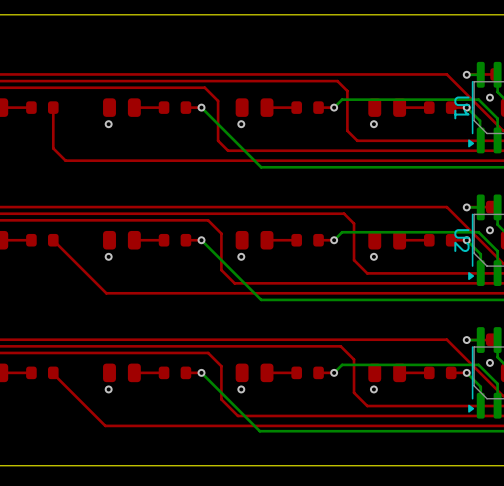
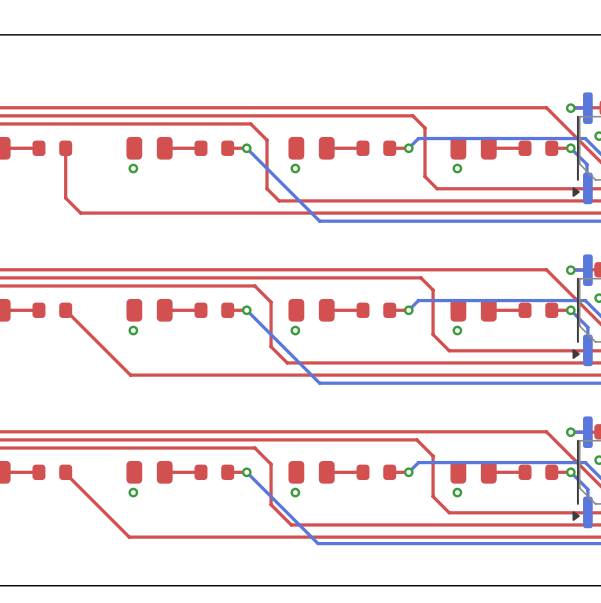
U1 name: U1 (461, 107) -> none
U2 name: U2 (461, 240) -> none

